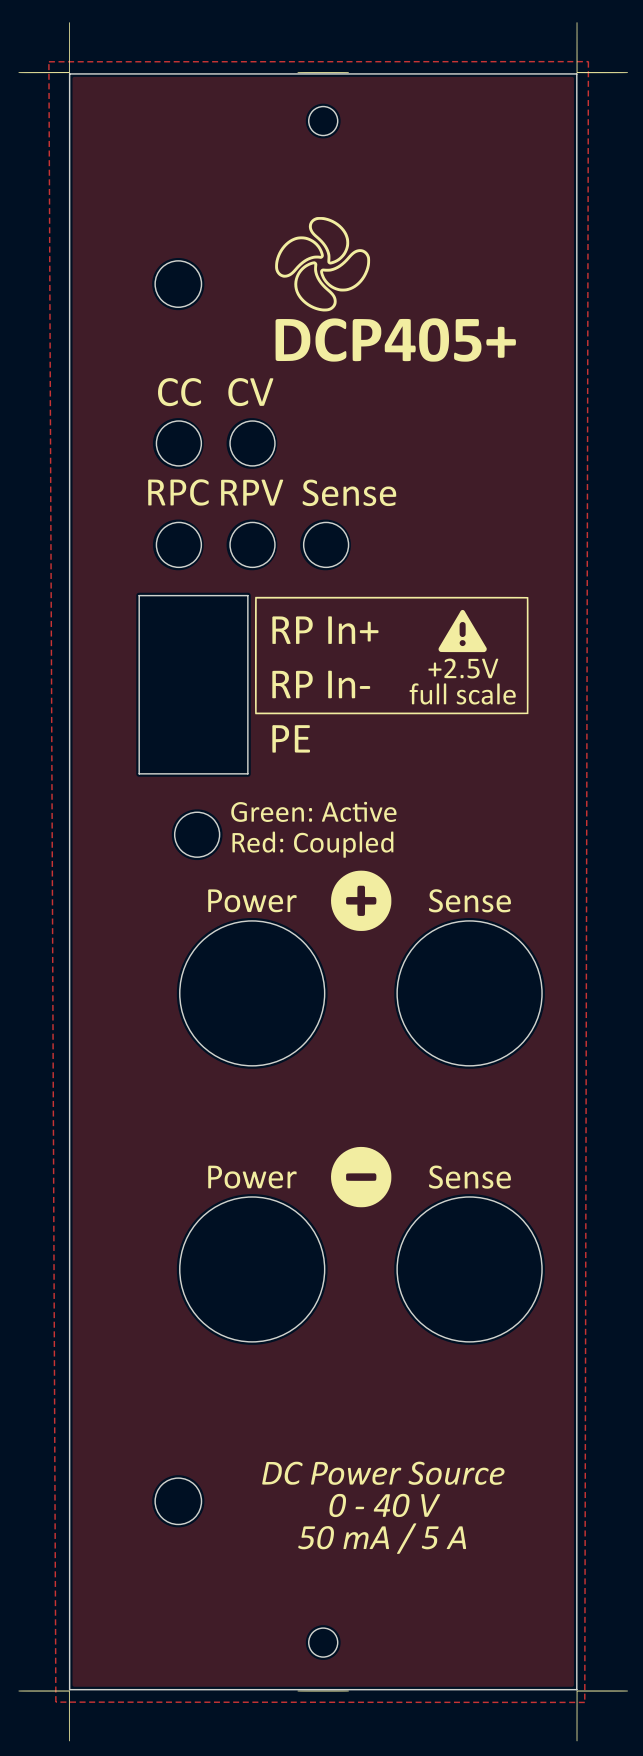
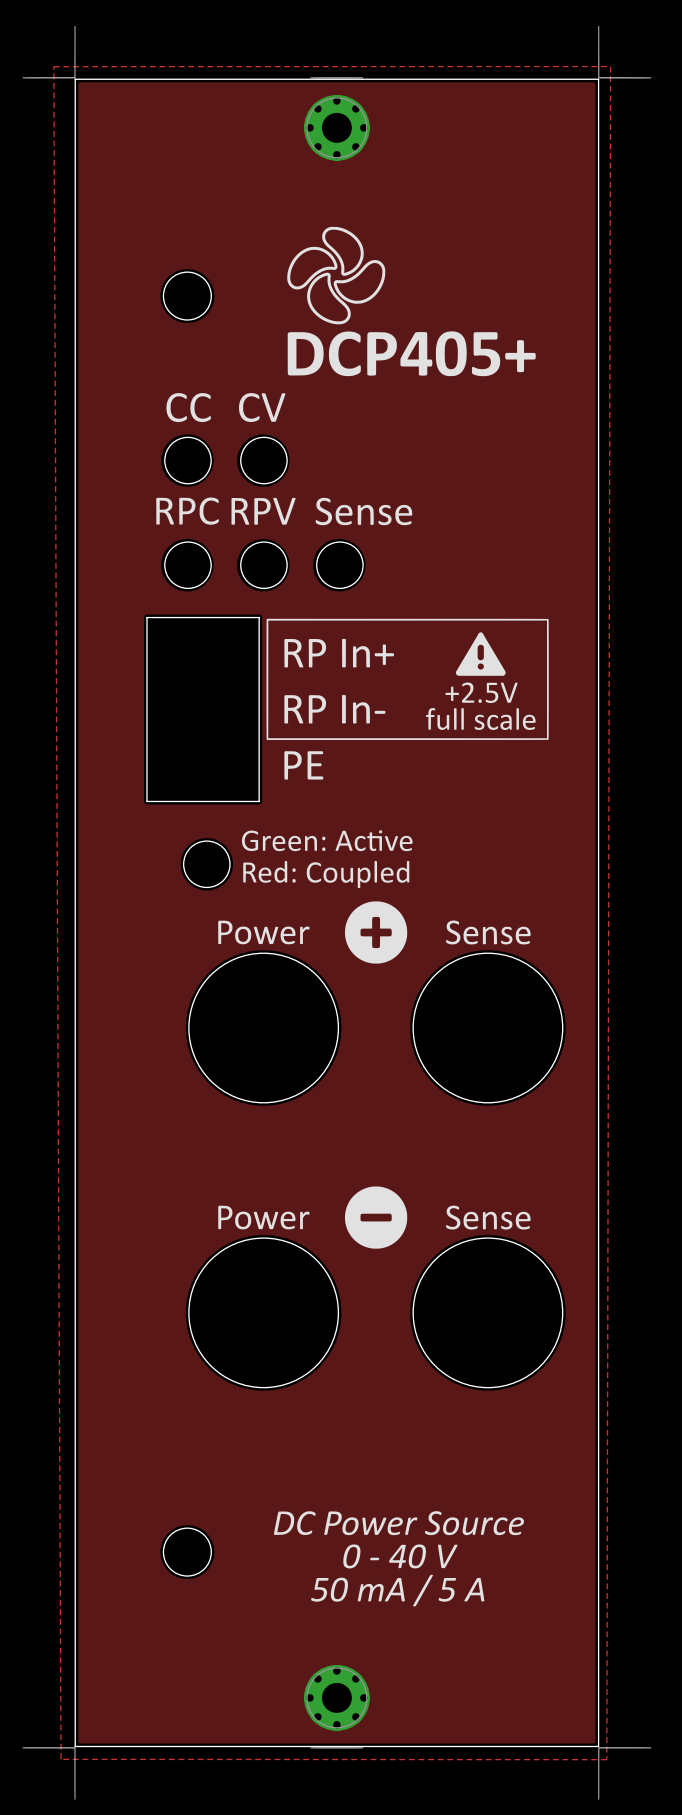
round board edge: [308, 106, 339, 136] -> none
part: none -> (336, 127)
round board edge: [308, 1627, 339, 1658] -> none
part: none -> (336, 1697)

